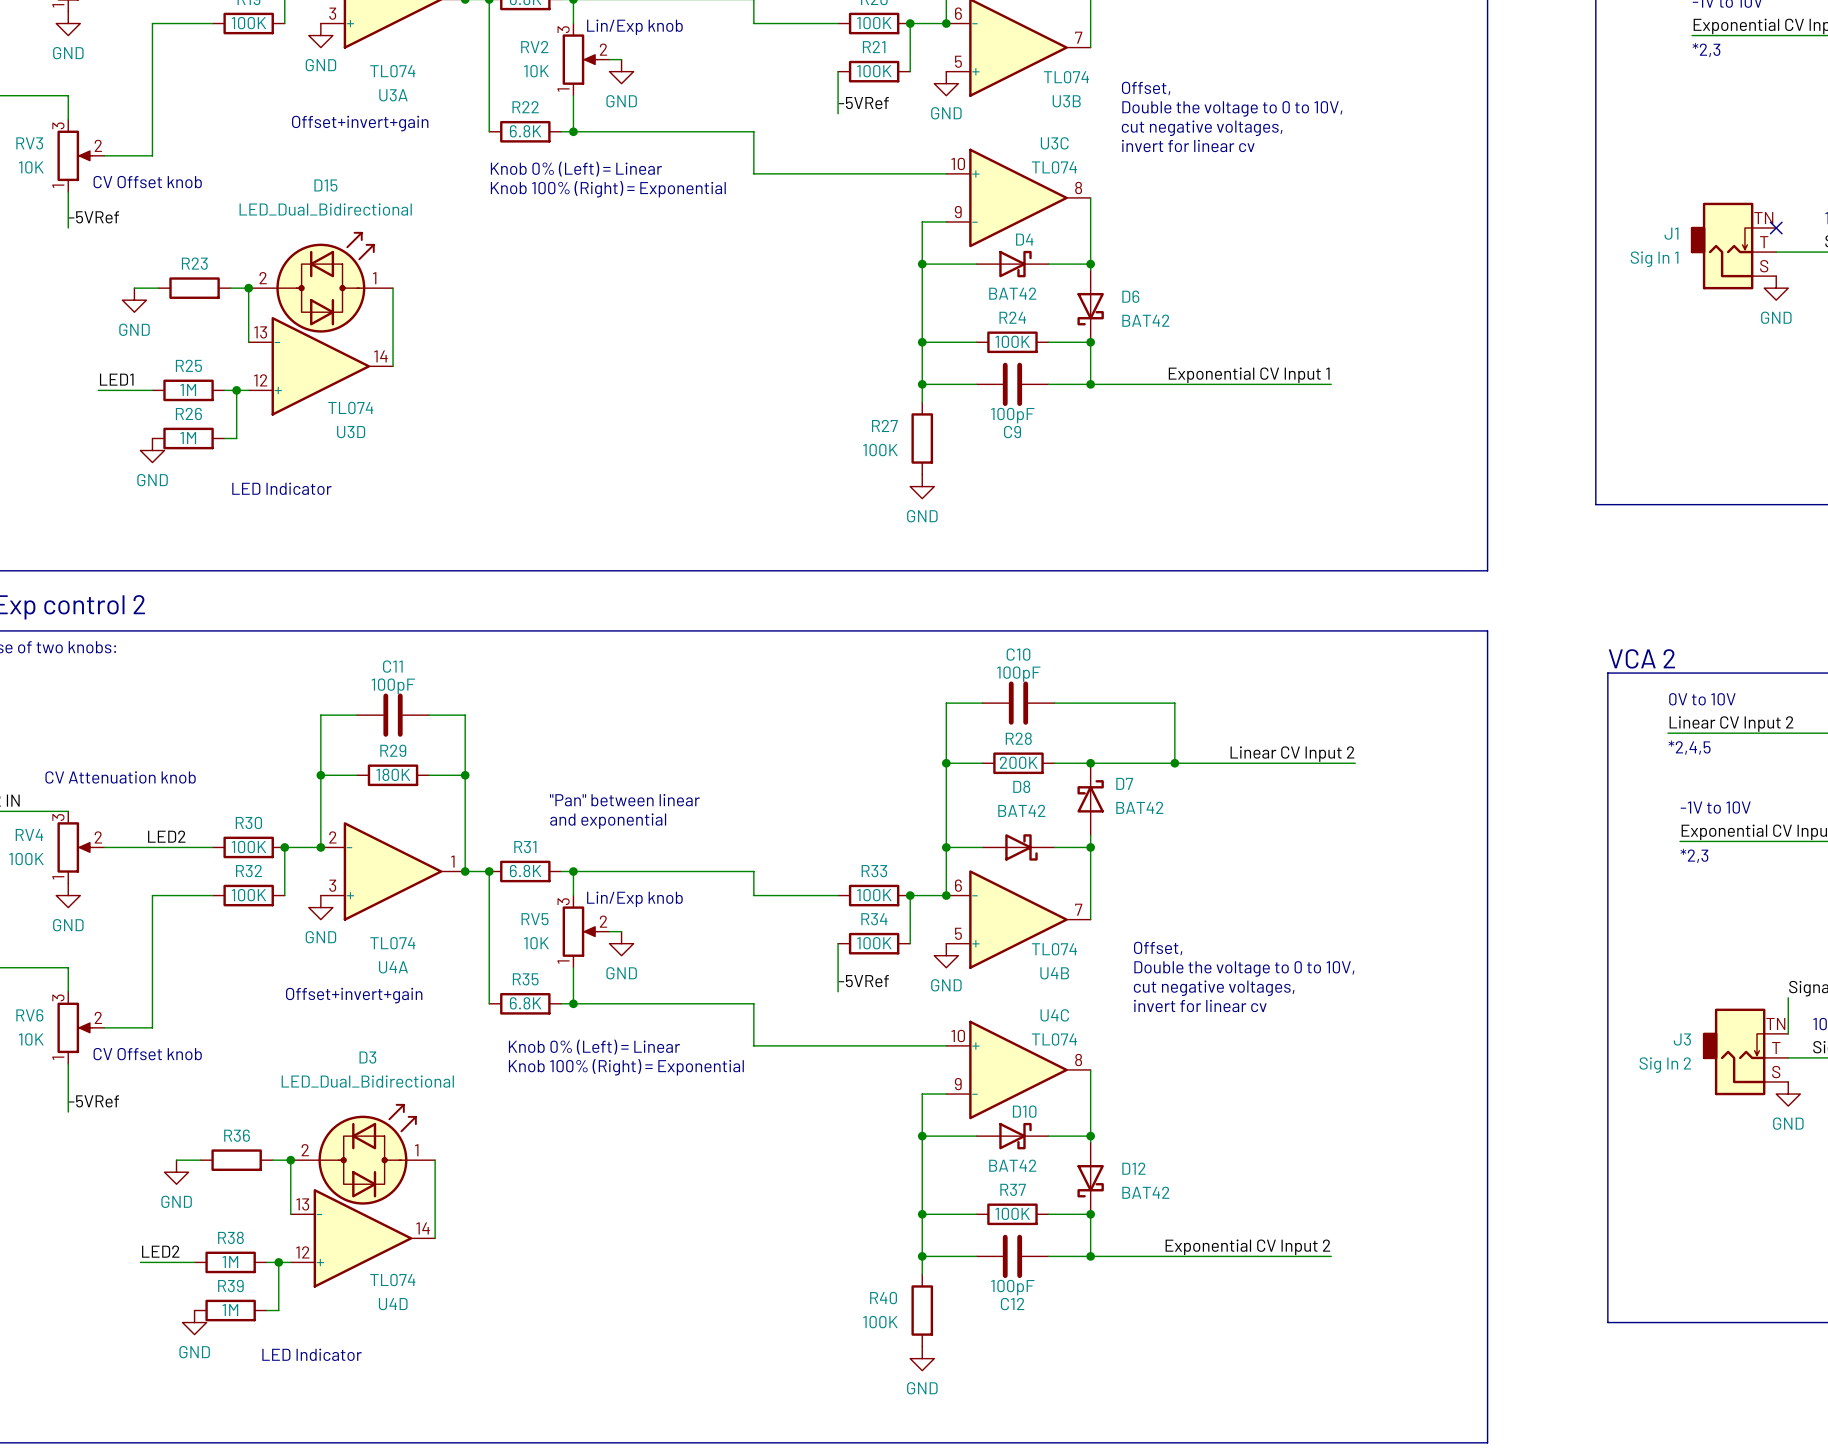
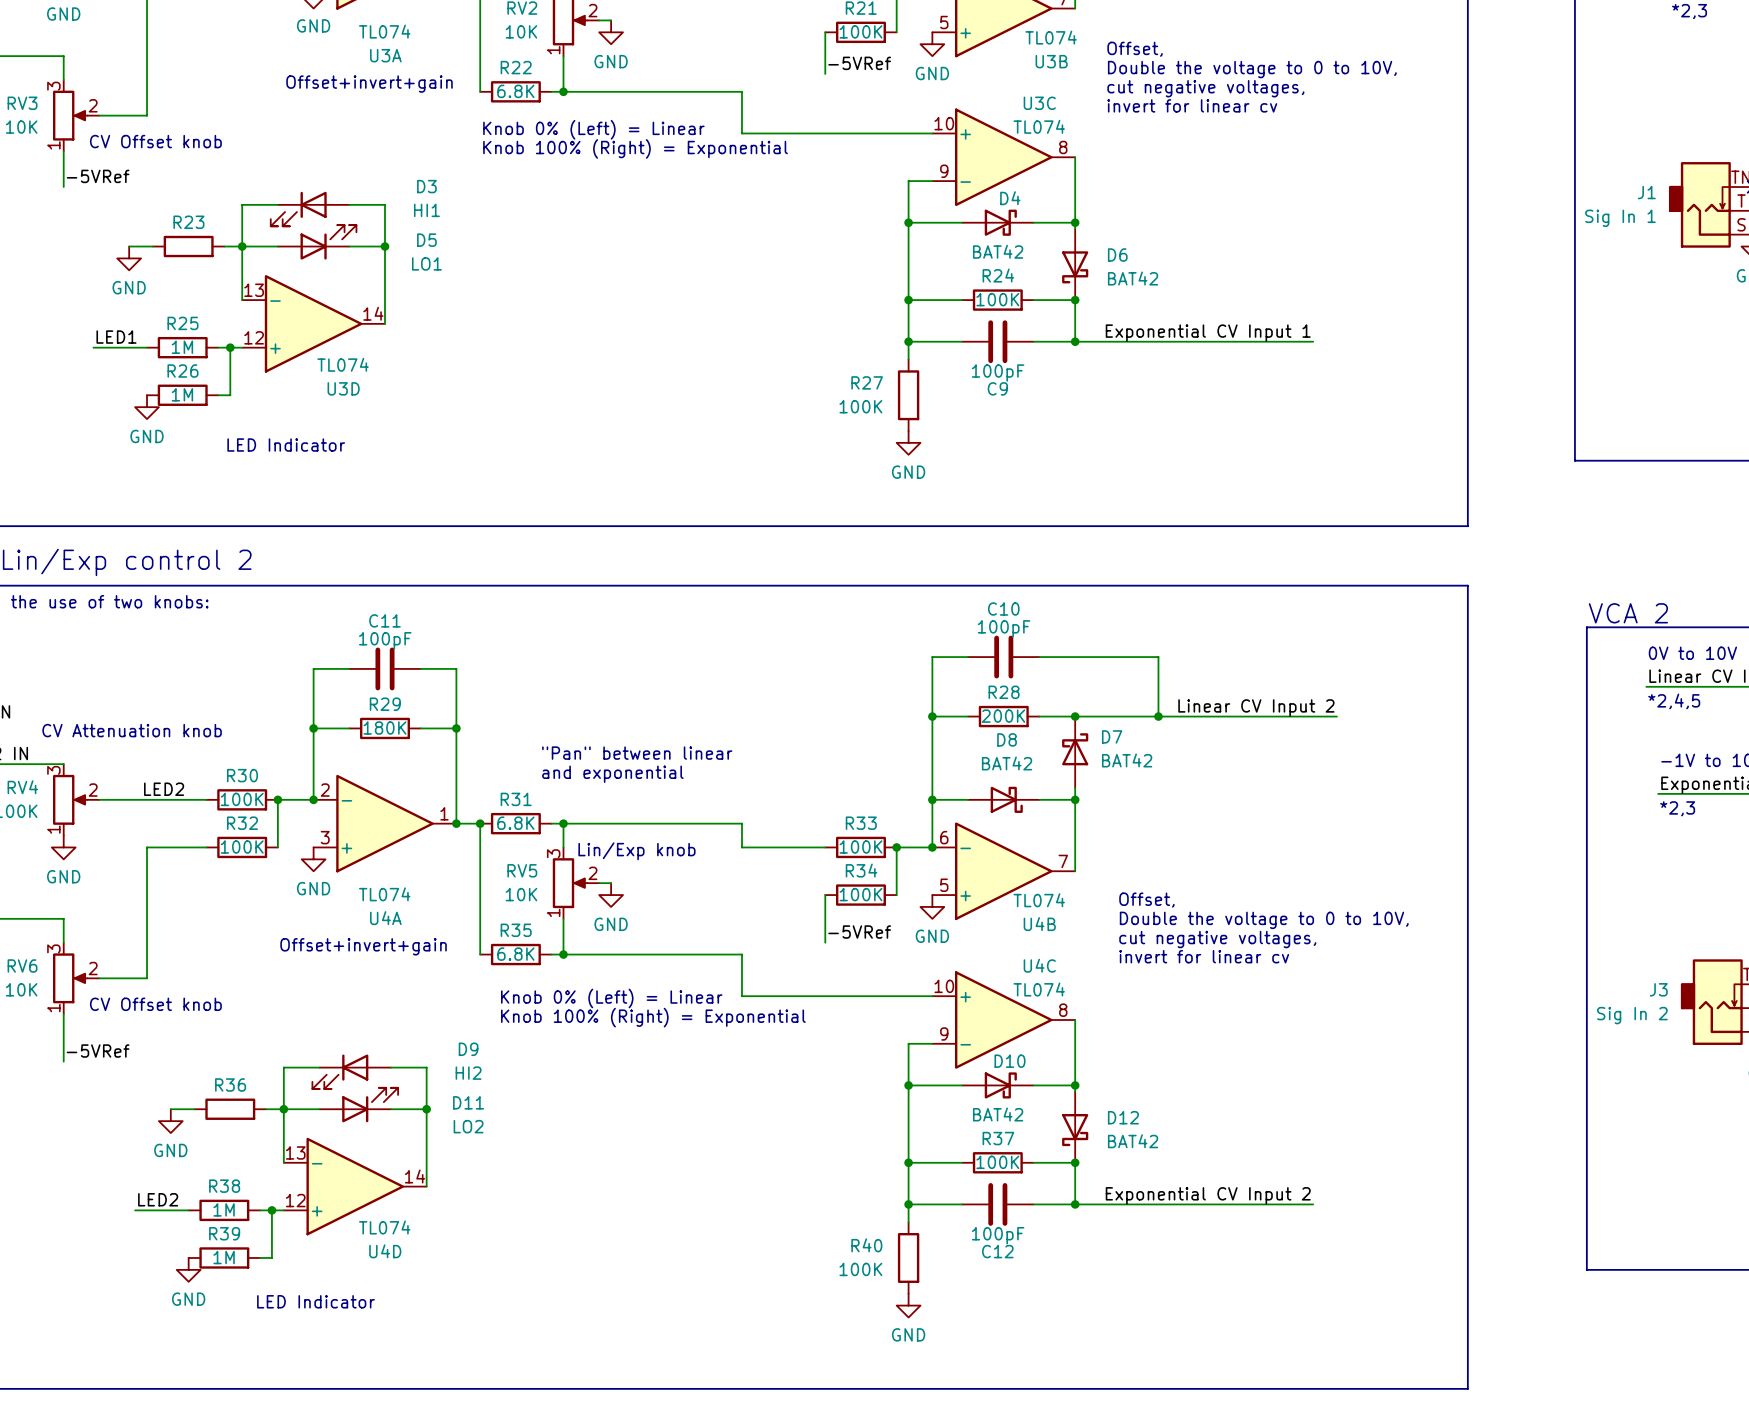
wire: none -> (277, 204) (242, 204) (242, 246) (277, 246)
wire: none -> (349, 204) (385, 204) (385, 246) (349, 246)
D15: LED_Dual_Bidirectional (320, 282) -> none
D5: none -> LO1 (317, 242)
junction: none -> (385, 246)
D3 name position: D3 (367, 1057) -> D3 (426, 186)
D3 value: LED_Dual_Bidirectional (367, 1081) -> HI1 (426, 210)
D3 symbol: [290, 1103, 436, 1205] -> [270, 191, 350, 227]
wire: none -> (319, 1067) (283, 1067) (283, 1109) (319, 1109)
wire: none -> (390, 1067) (426, 1067) (426, 1109) (390, 1109)
D9: none -> HI2 (351, 1071)
D11: none -> LO2 (358, 1105)
junction: none -> (426, 1109)

